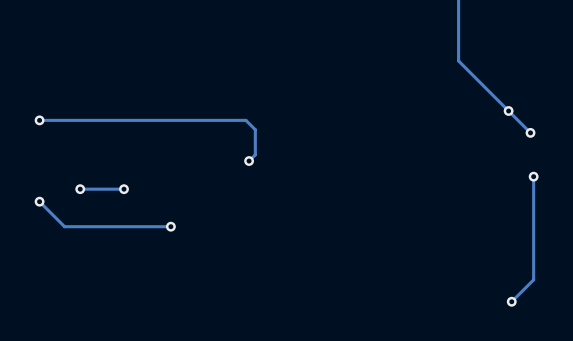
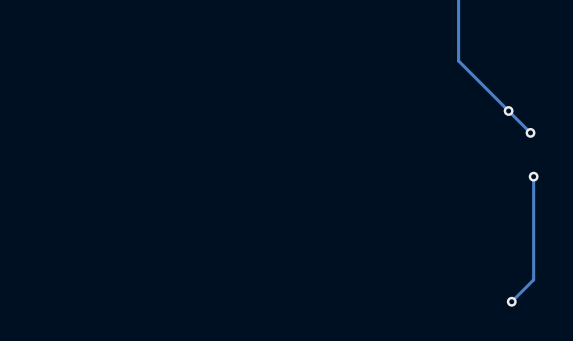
track: (39, 120) (245, 120) (255, 129) (255, 154) (249, 161) -> none
via: (39, 120) -> none
via: (249, 161) -> none
via: (80, 189) -> none
track: (124, 189) (80, 189) -> none
via: (124, 189) -> none
track: (39, 201) (64, 226) (170, 226) -> none
via: (39, 201) -> none
via: (170, 226) -> none

